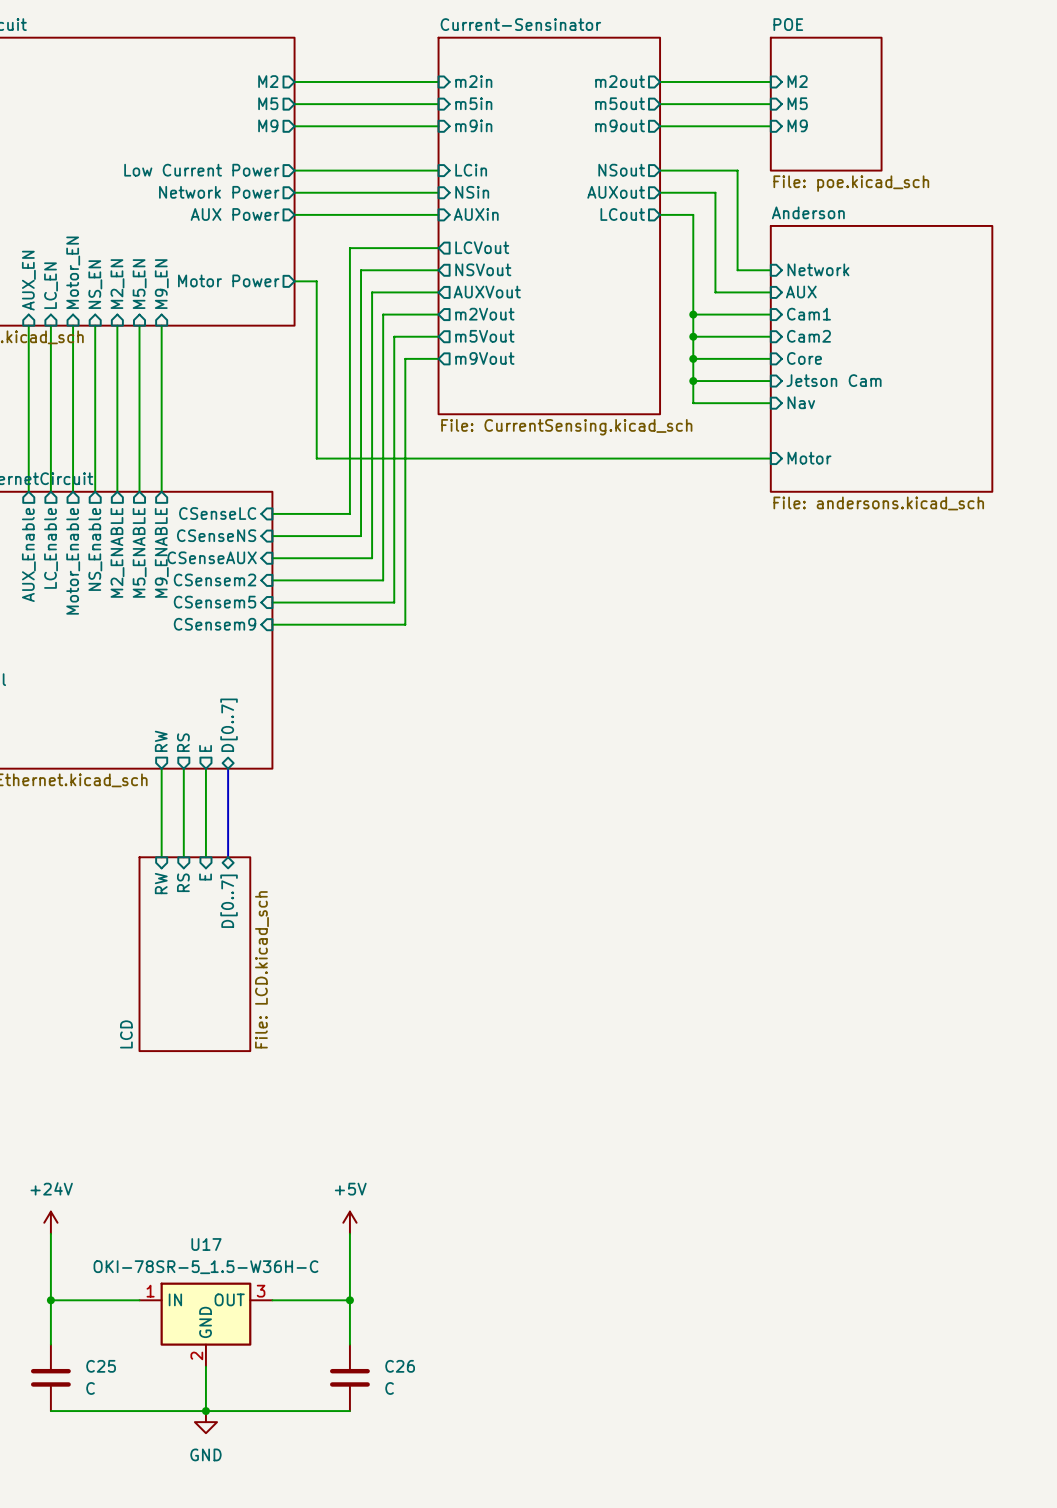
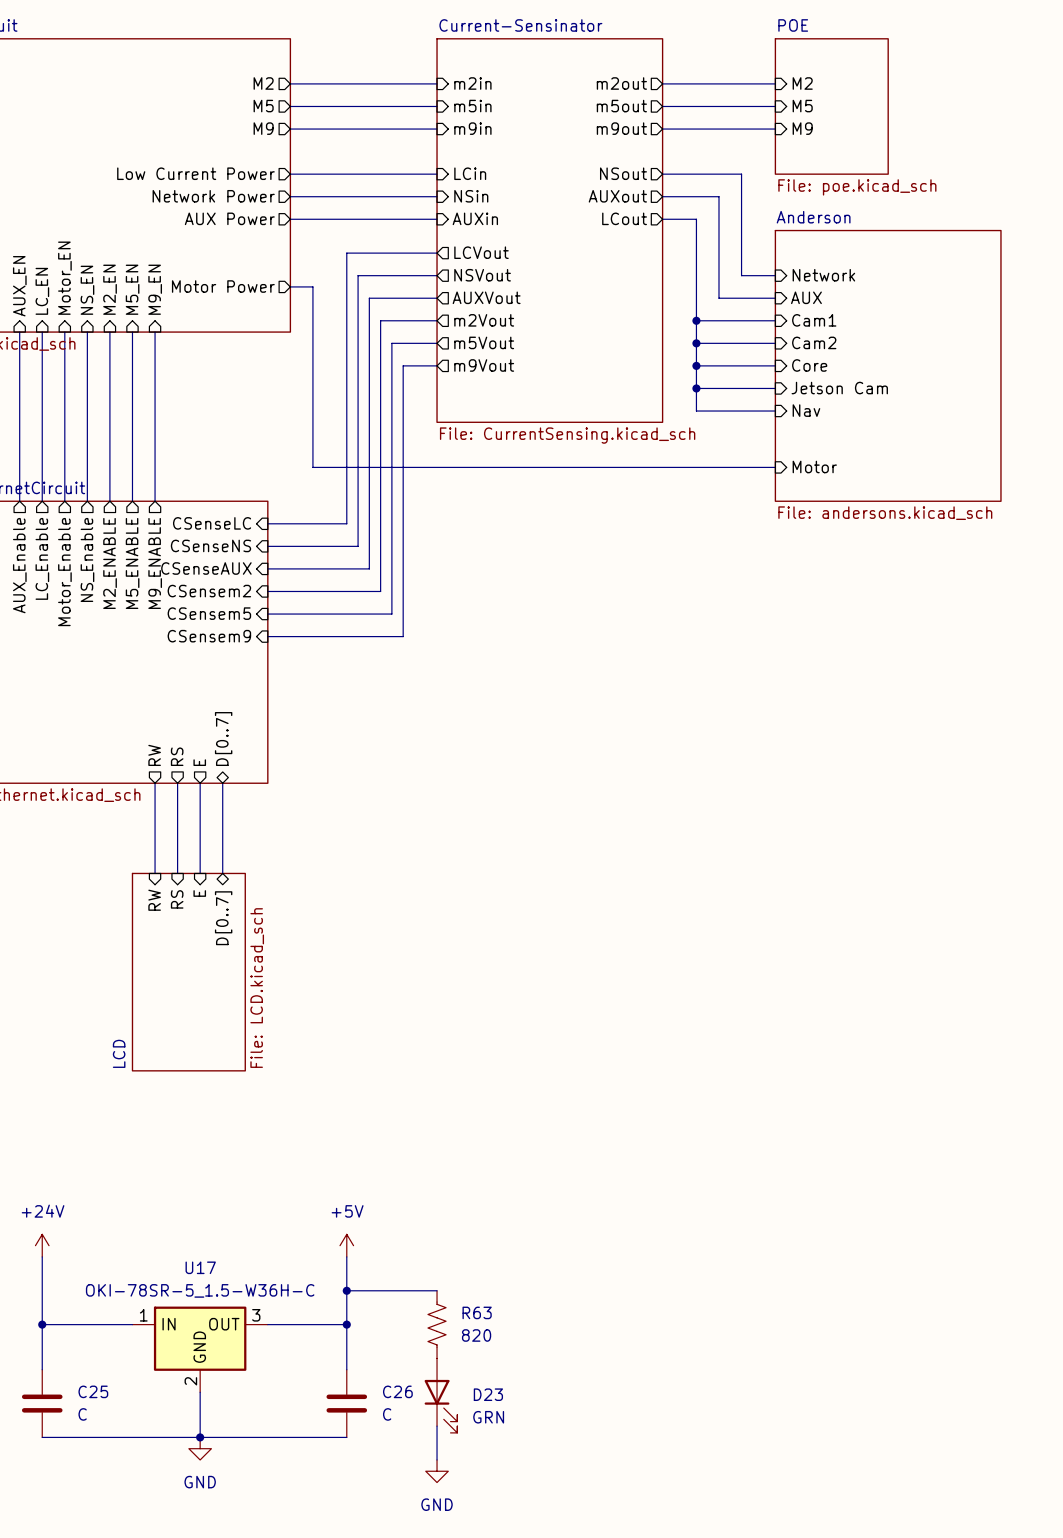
wire: none -> (346, 1290) (437, 1290)
junction: none -> (346, 1290)
R63: none -> 820 (437, 1324)
D23: none -> GRN (440, 1395)
wire: none -> (437, 1426) (437, 1459)
power symbol: none -> GND (437, 1471)

